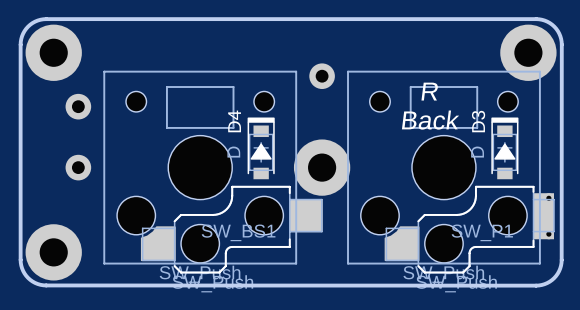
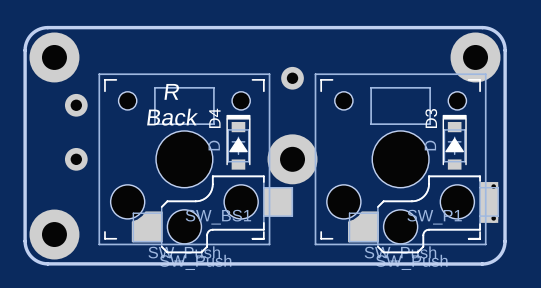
part footprint: [103, 70, 298, 265] -> [98, 73, 271, 246]
part footprint: [347, 70, 541, 265] -> [314, 73, 487, 246]
text position: R (429, 91) -> R (171, 91)
text position: Back (430, 120) -> Back (172, 117)

